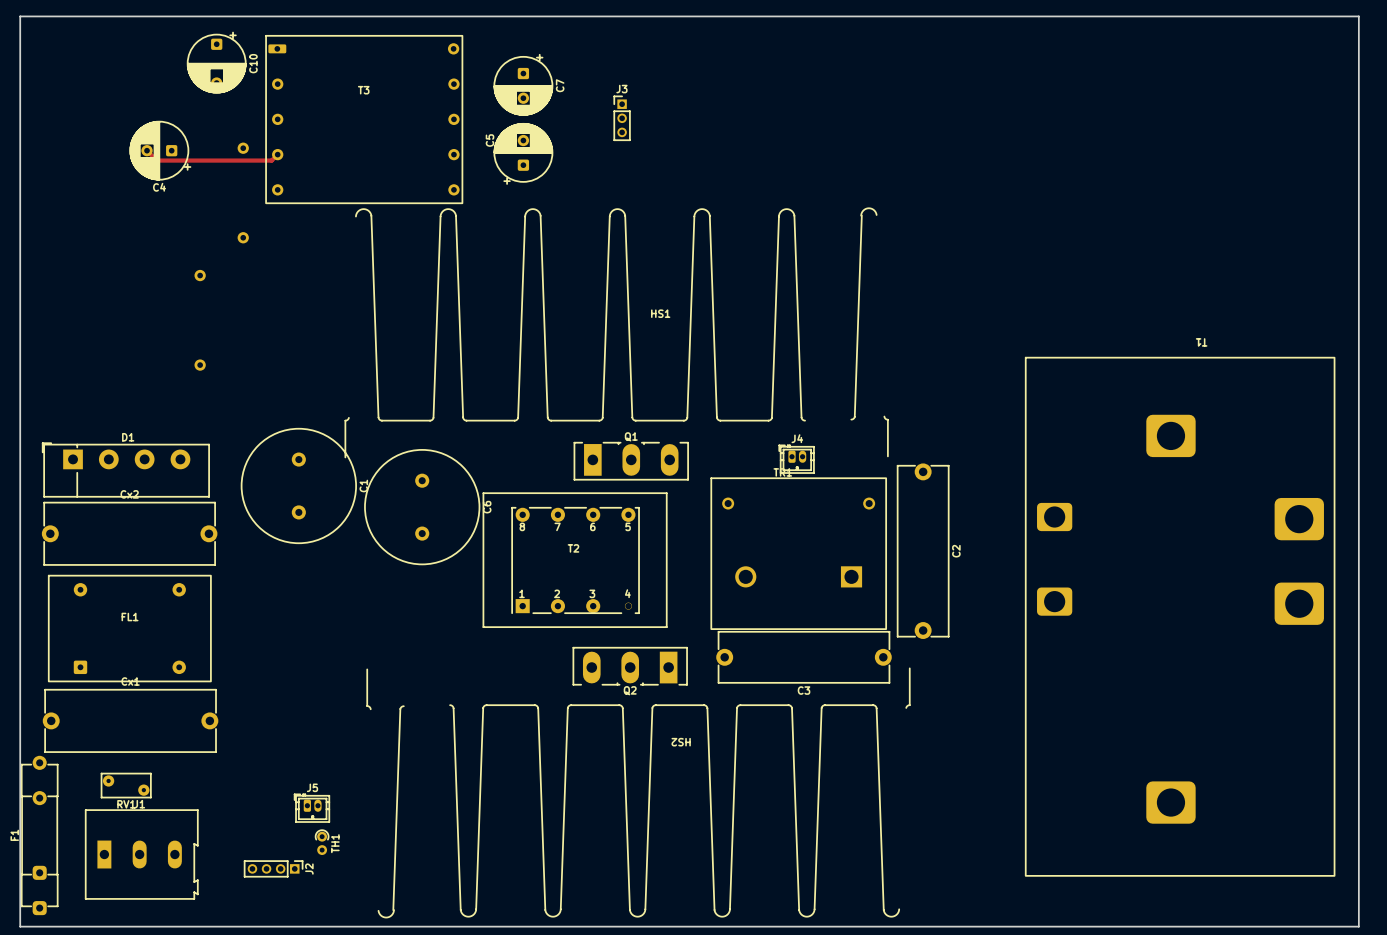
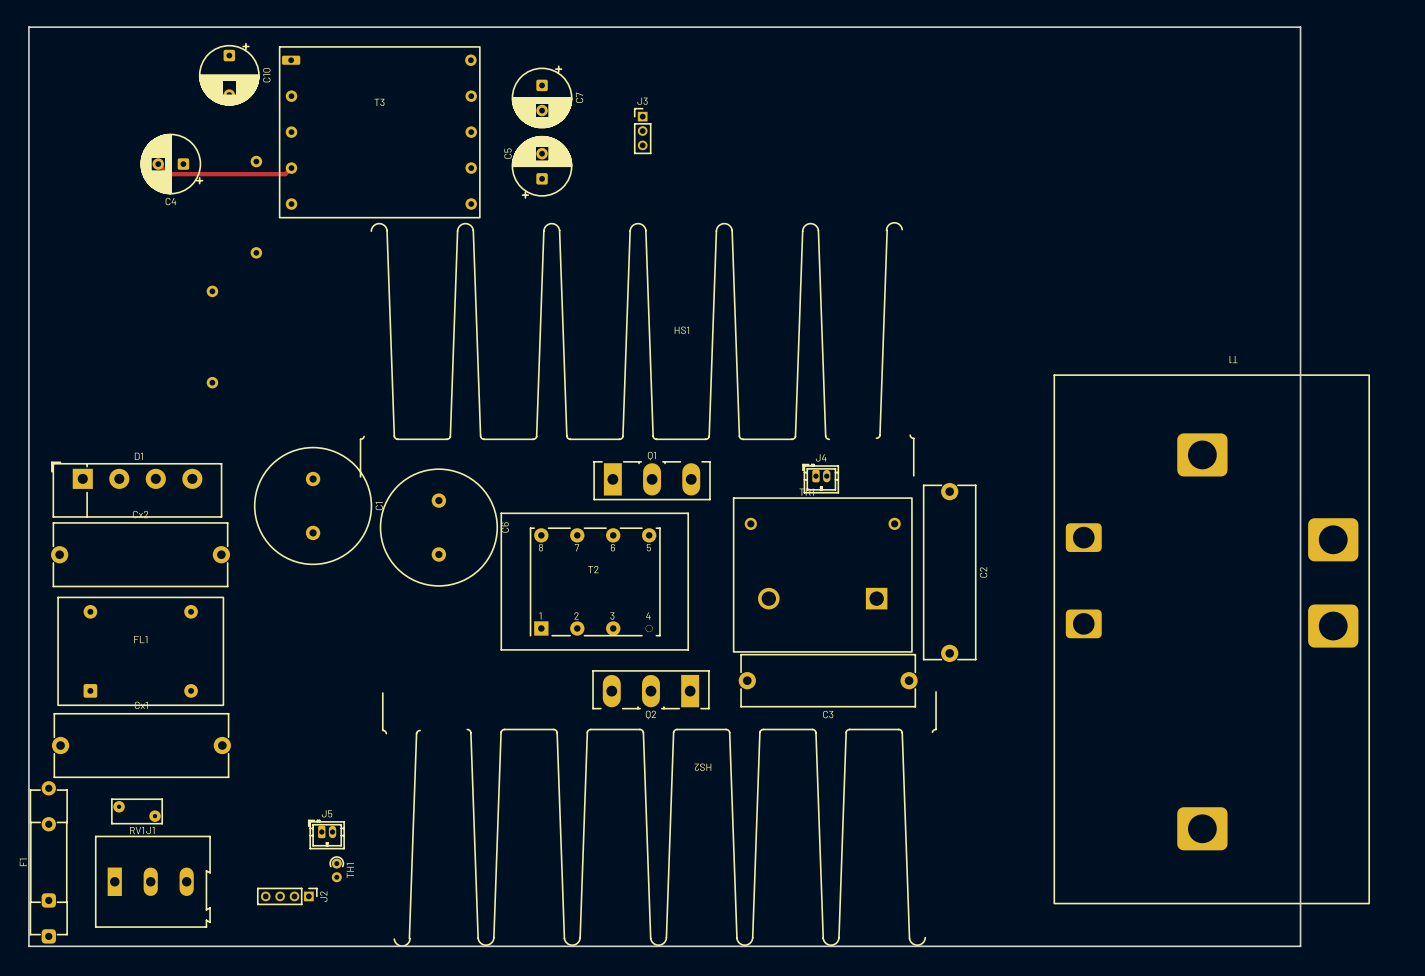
board edge: (1267, 16) (1358, 16) (1358, 926) (20, 926) (20, 917) -> (1300, 27) (1300, 946) (28, 946)

